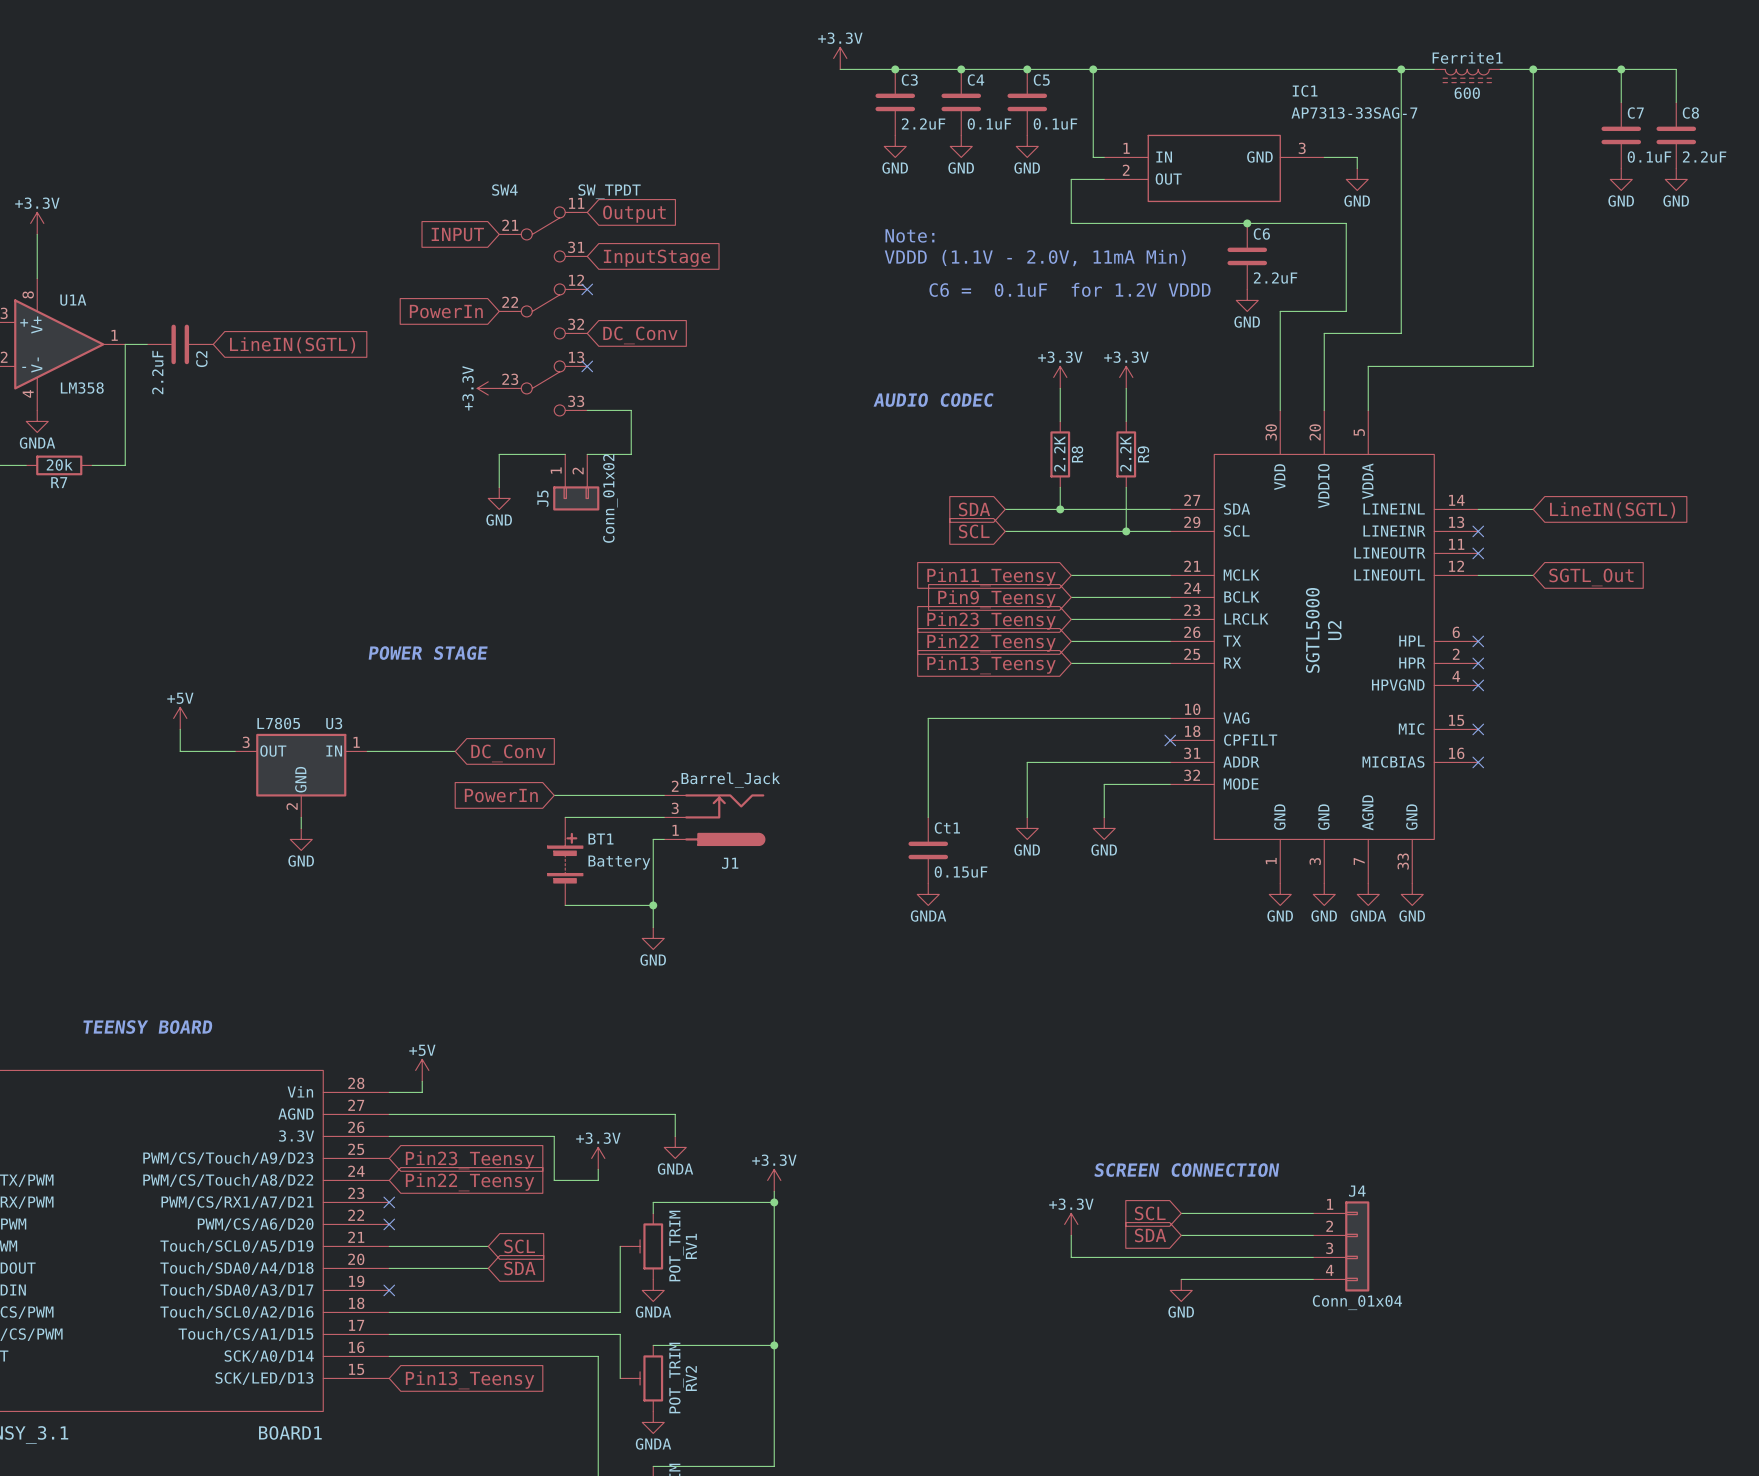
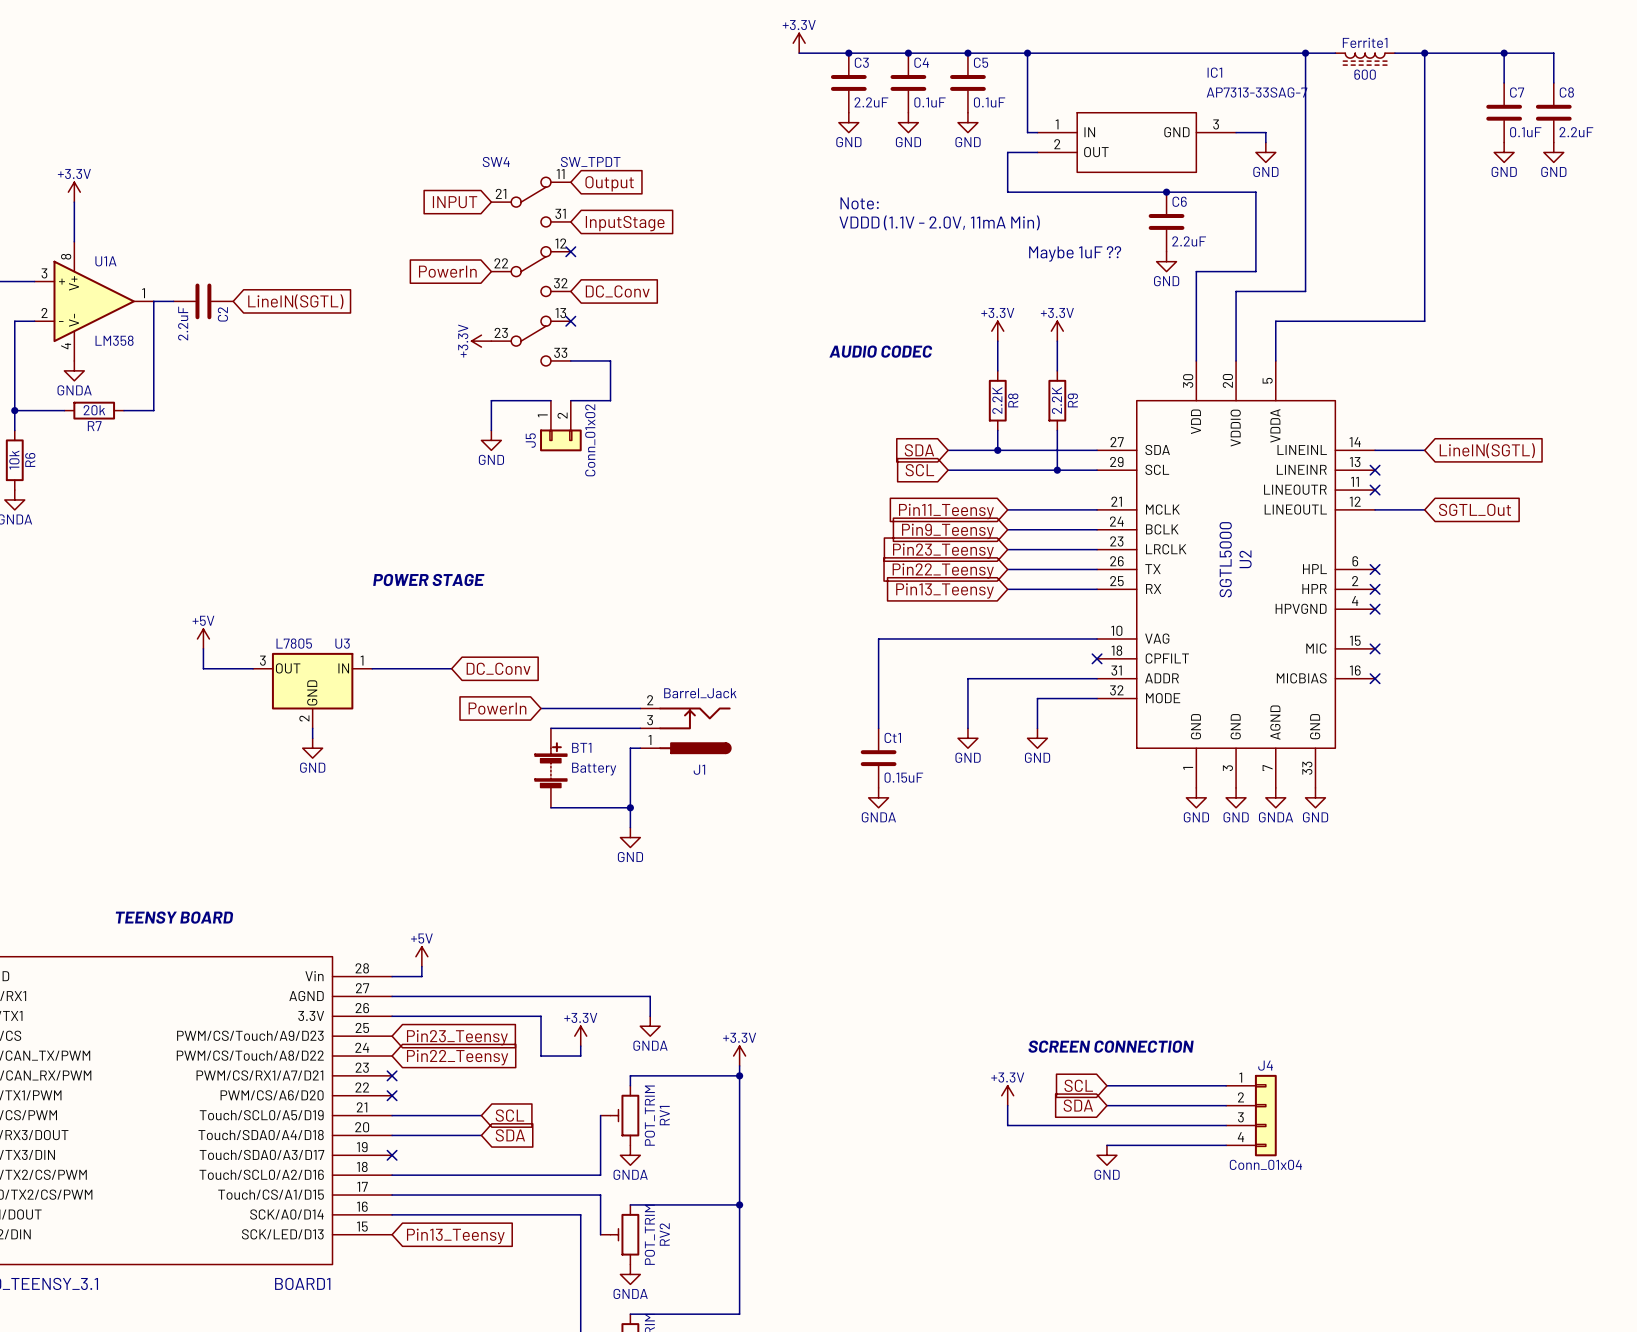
text: C6 = 0.1uF for 1.2V VDDD (1070, 289) -> none
text: none -> Maybe 1uF ?? (1075, 253)

